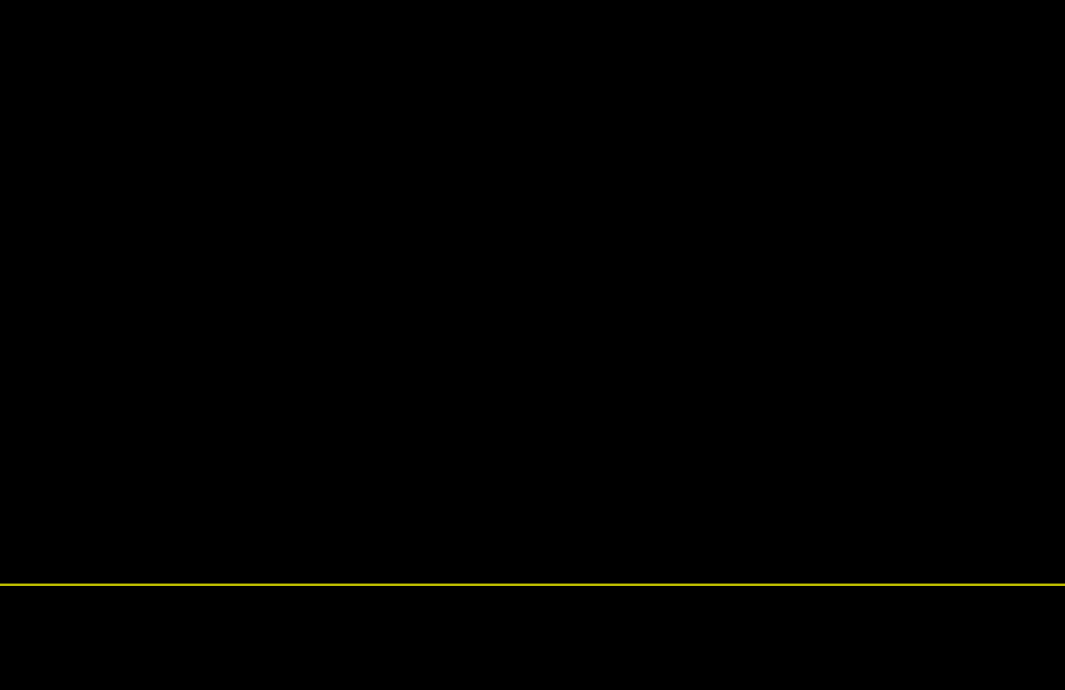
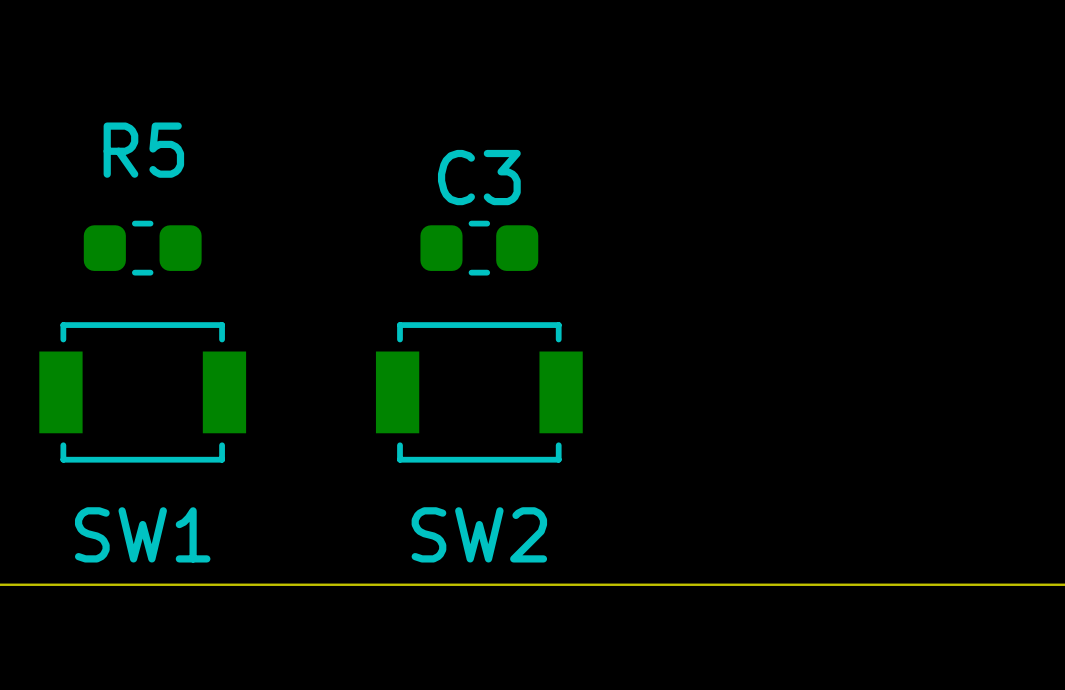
R5: none -> (142, 248)
C3: none -> (479, 248)
SW1: none -> (142, 392)
SW2: none -> (479, 392)

